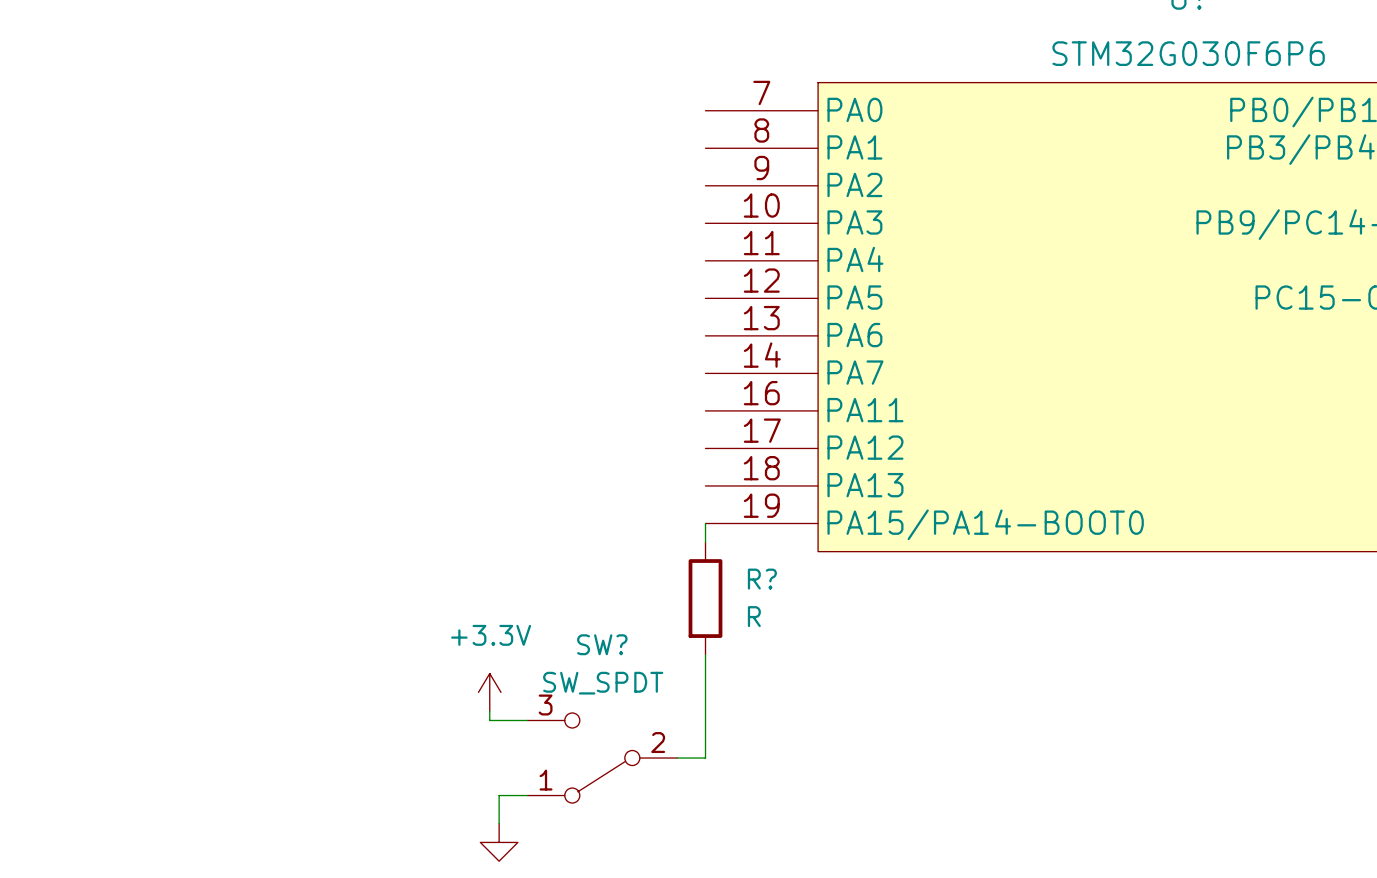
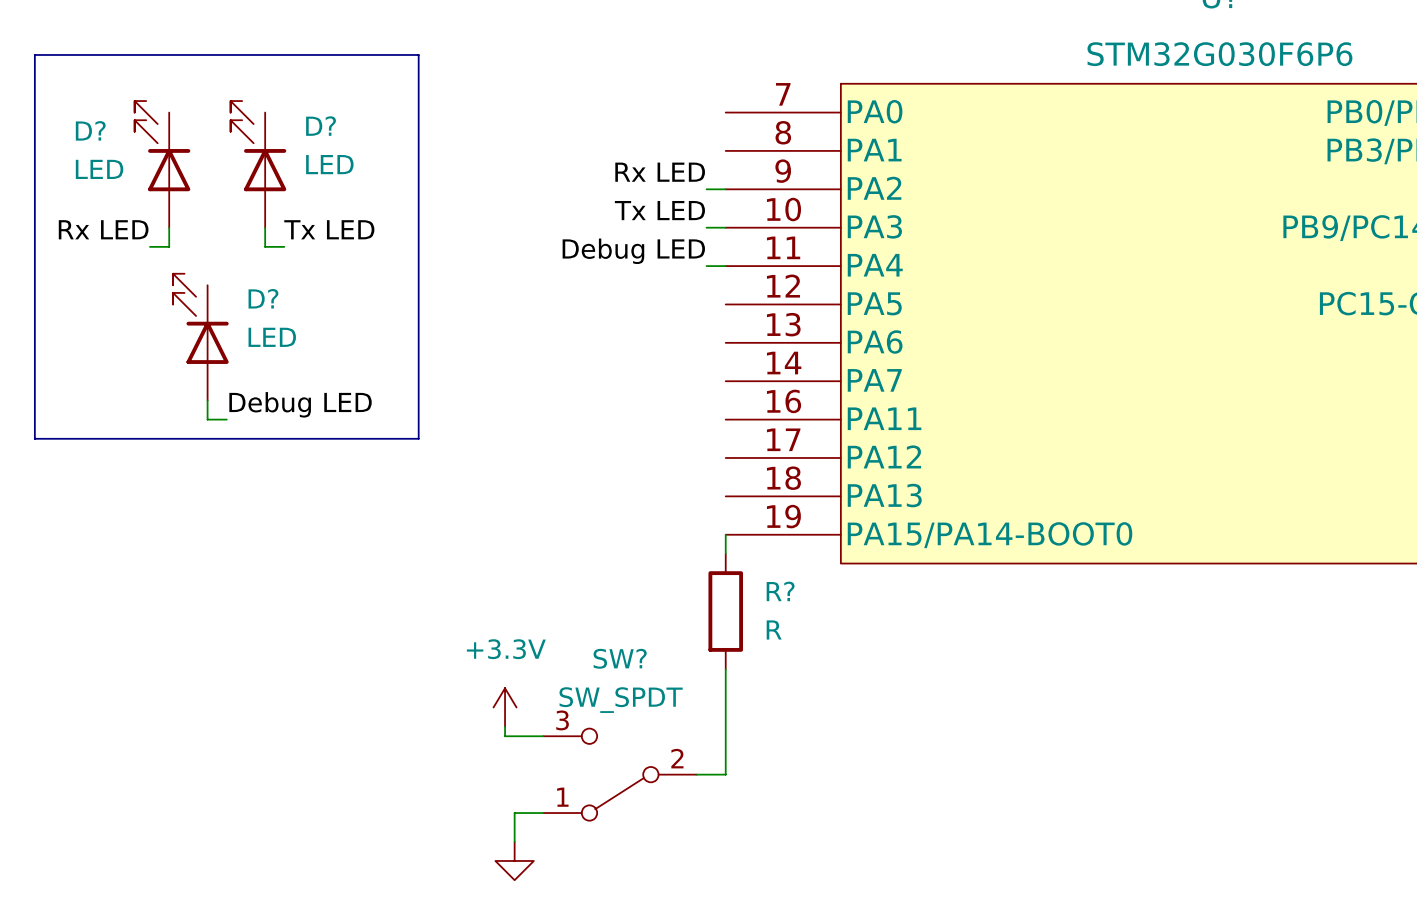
line: none -> (34, 54) (418, 54) (418, 438) (34, 438) (34, 54)
D?: none -> LED (162, 164)
D?: none -> LED (258, 164)
label: none -> Rx LED (660, 172)
wire: none -> (706, 189) (725, 189)
label: none -> Tx LED (659, 210)
wire: none -> (169, 227) (169, 246) (150, 246)
wire: none -> (265, 227) (265, 246) (284, 246)
wire: none -> (706, 227) (725, 227)
label: none -> Rx LED (103, 229)
label: none -> Tx LED (329, 229)
label: none -> Debug LED (633, 251)
wire: none -> (706, 266) (725, 266)
D?: none -> LED (200, 337)
wire: none -> (207, 400) (207, 419) (226, 419)
label: none -> Debug LED (300, 404)

